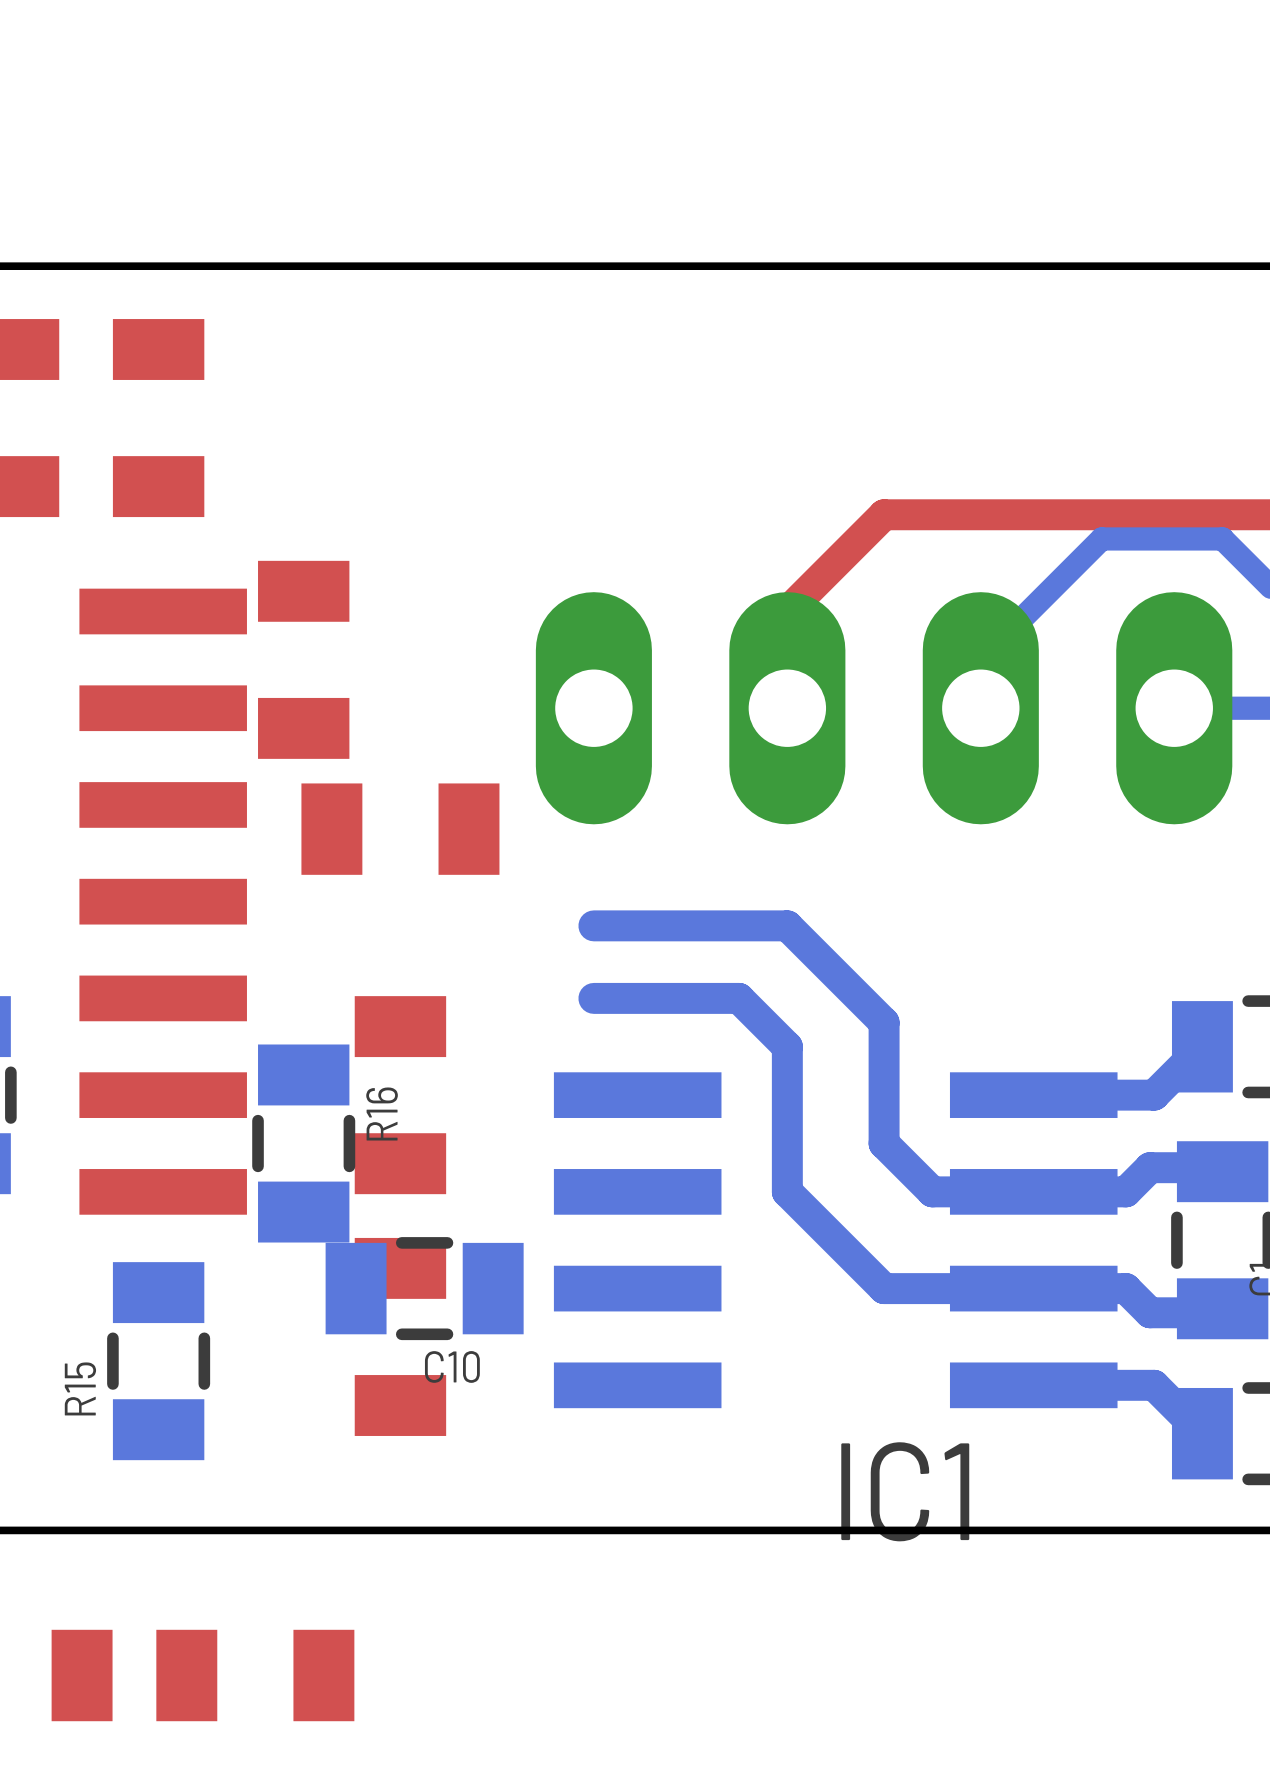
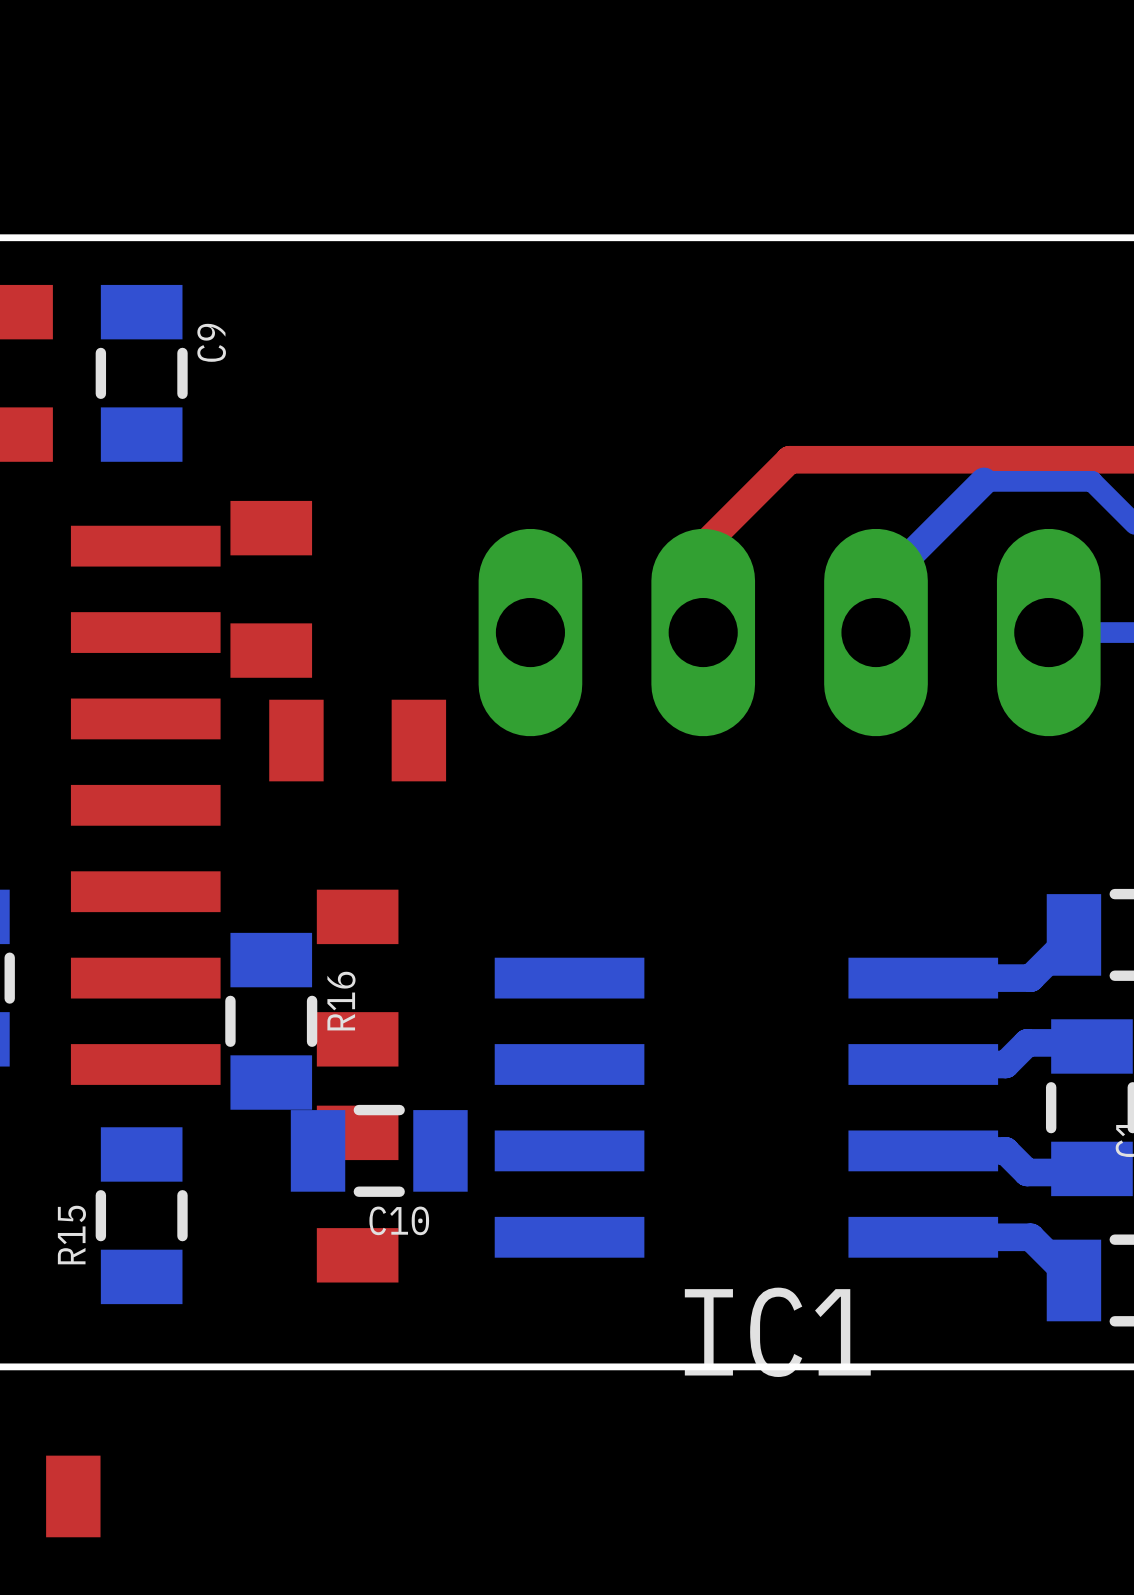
C9 side: top (158, 418) -> bottom (141, 373)
bottom track width: thin (1101, 538) (980, 659) (980, 708) -> thick (983, 481) (876, 589) (876, 632)
bottom track: (593, 925) (787, 925) (884, 1022) (884, 1143) (932, 1191) (1033, 1191) -> none
bottom track: (593, 998) (738, 998) (787, 1046) (787, 1191) (884, 1288) (1033, 1288) -> none
part: (255, 1675) -> none

